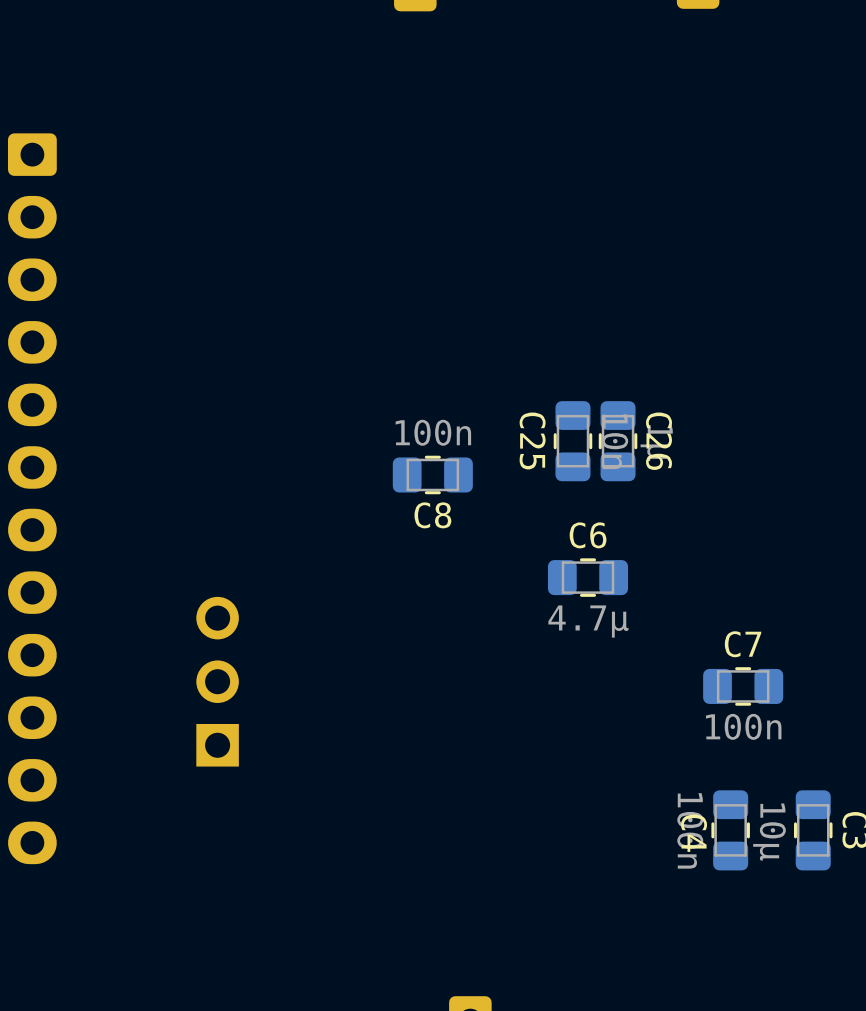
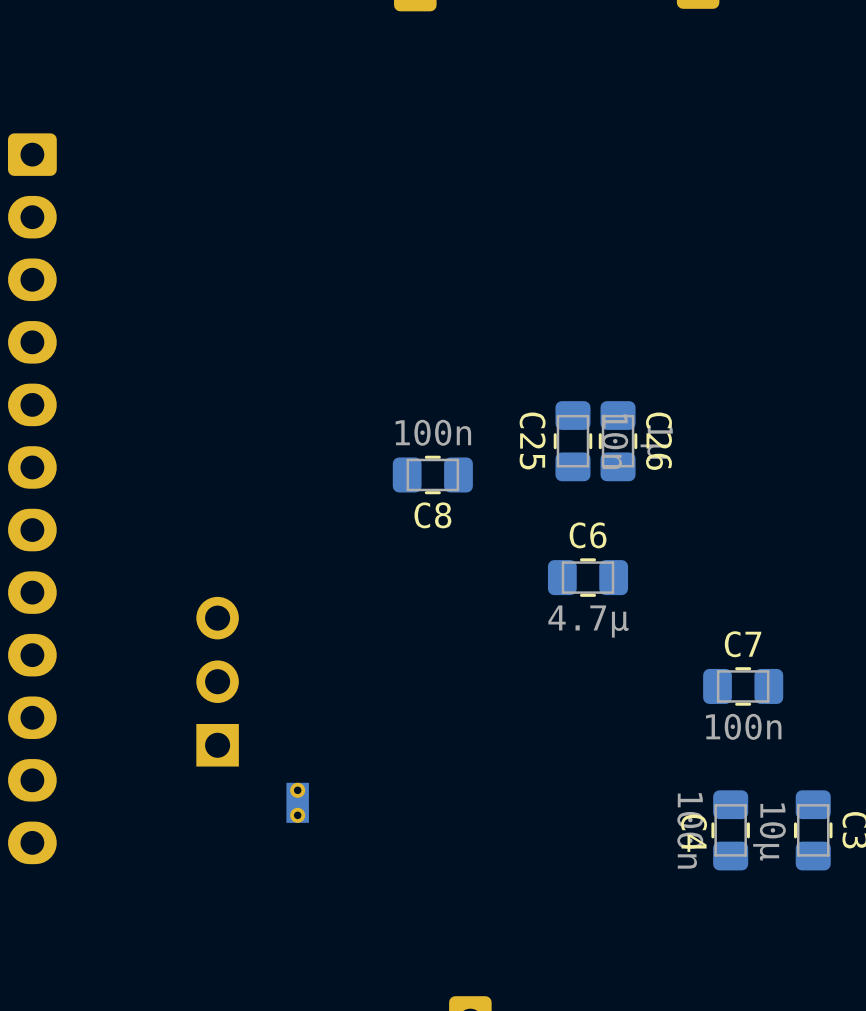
part: none -> (297, 802)

